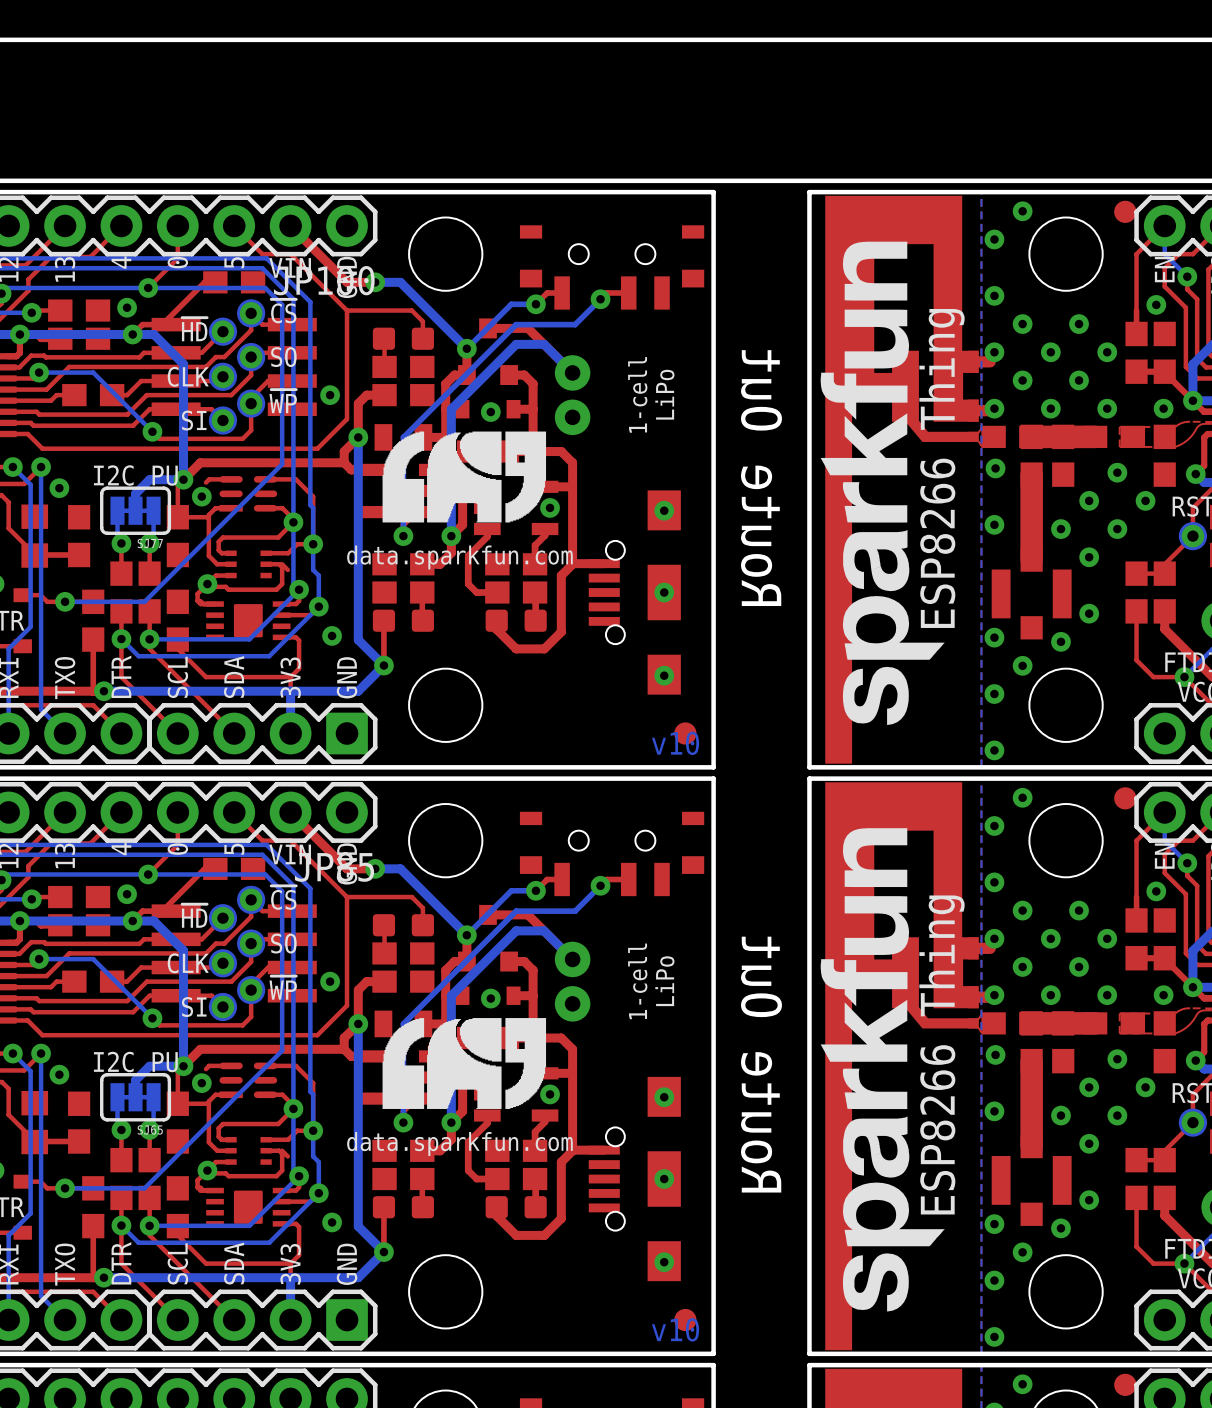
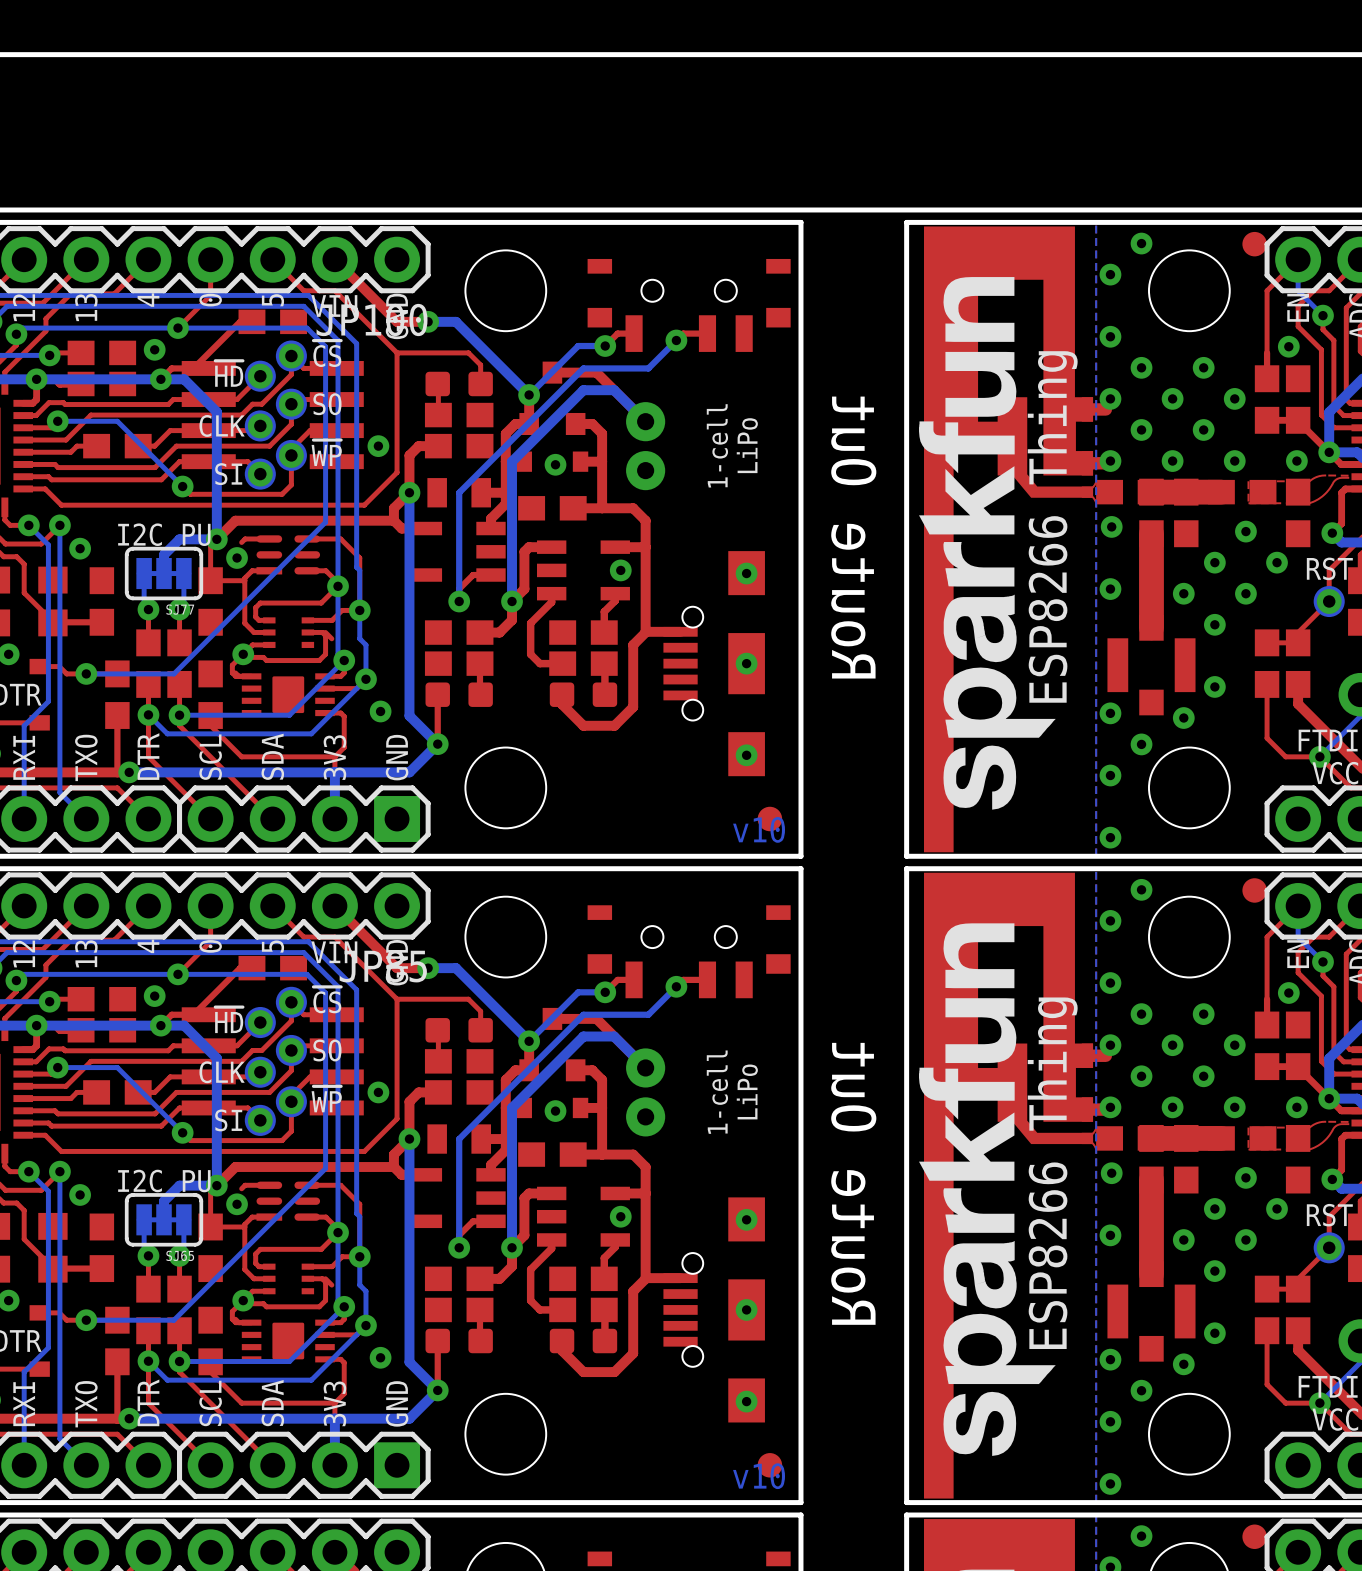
drawing: [382, 431, 547, 523] -> none
text: data.sparkfun.com (459, 557) -> none
drawing: [382, 1018, 547, 1109] -> none
text: data.sparkfun.com (459, 1143) -> none

